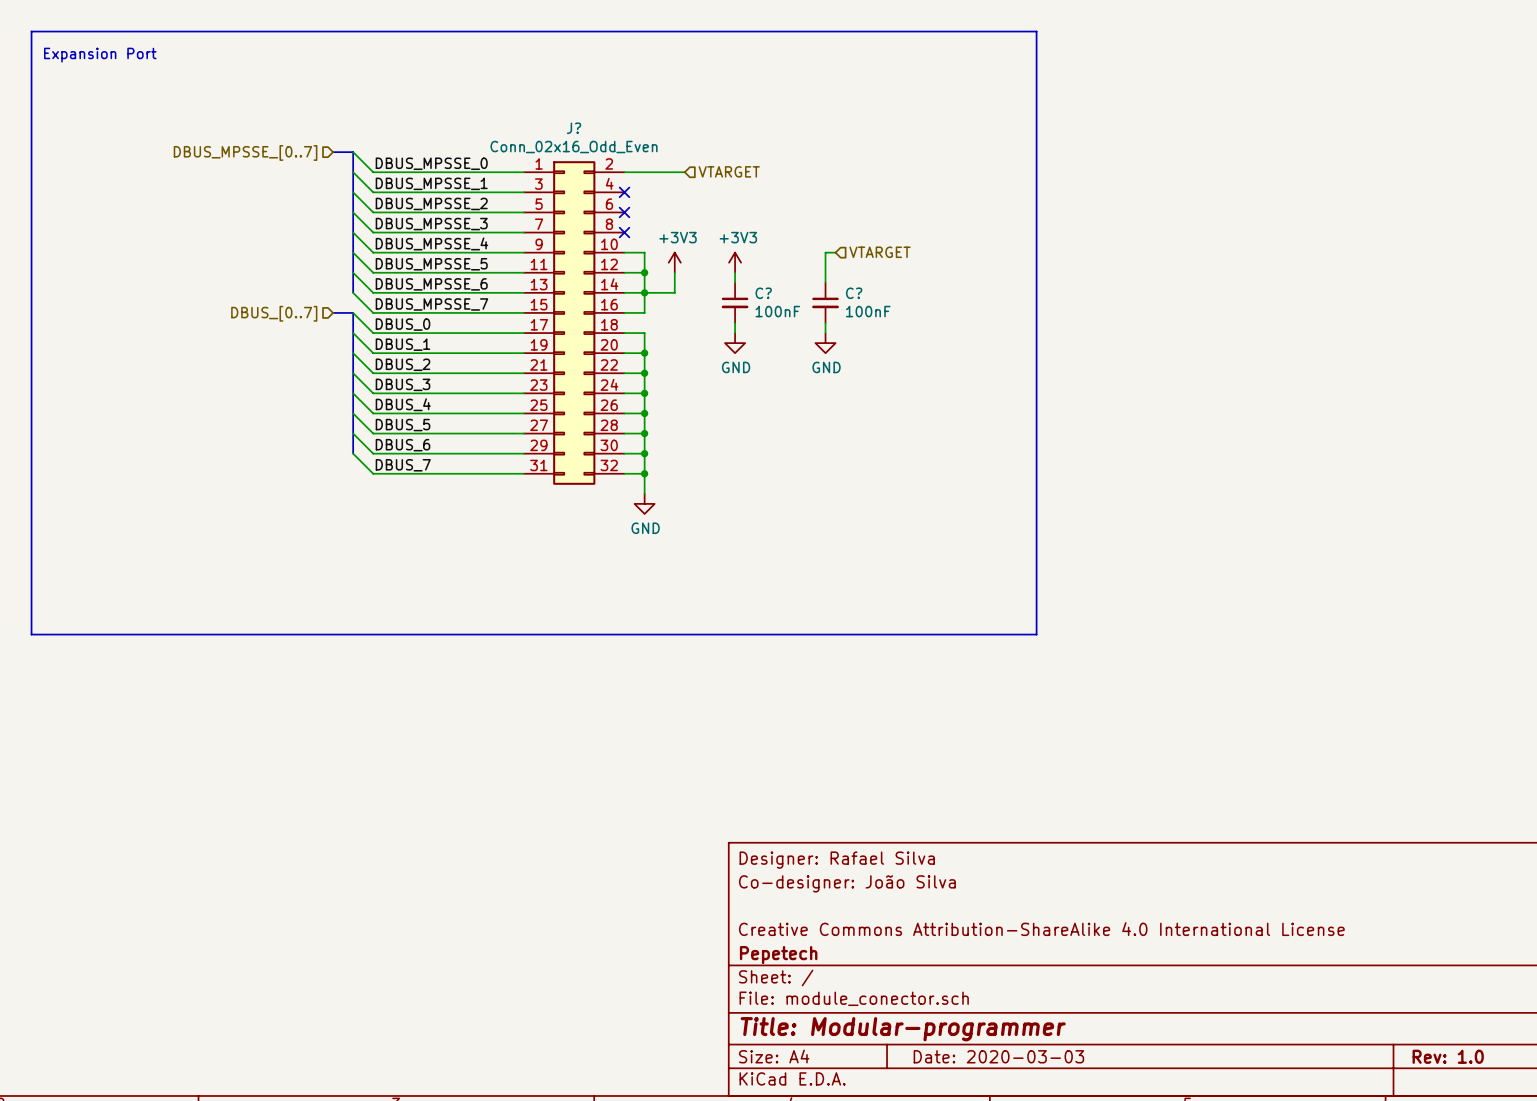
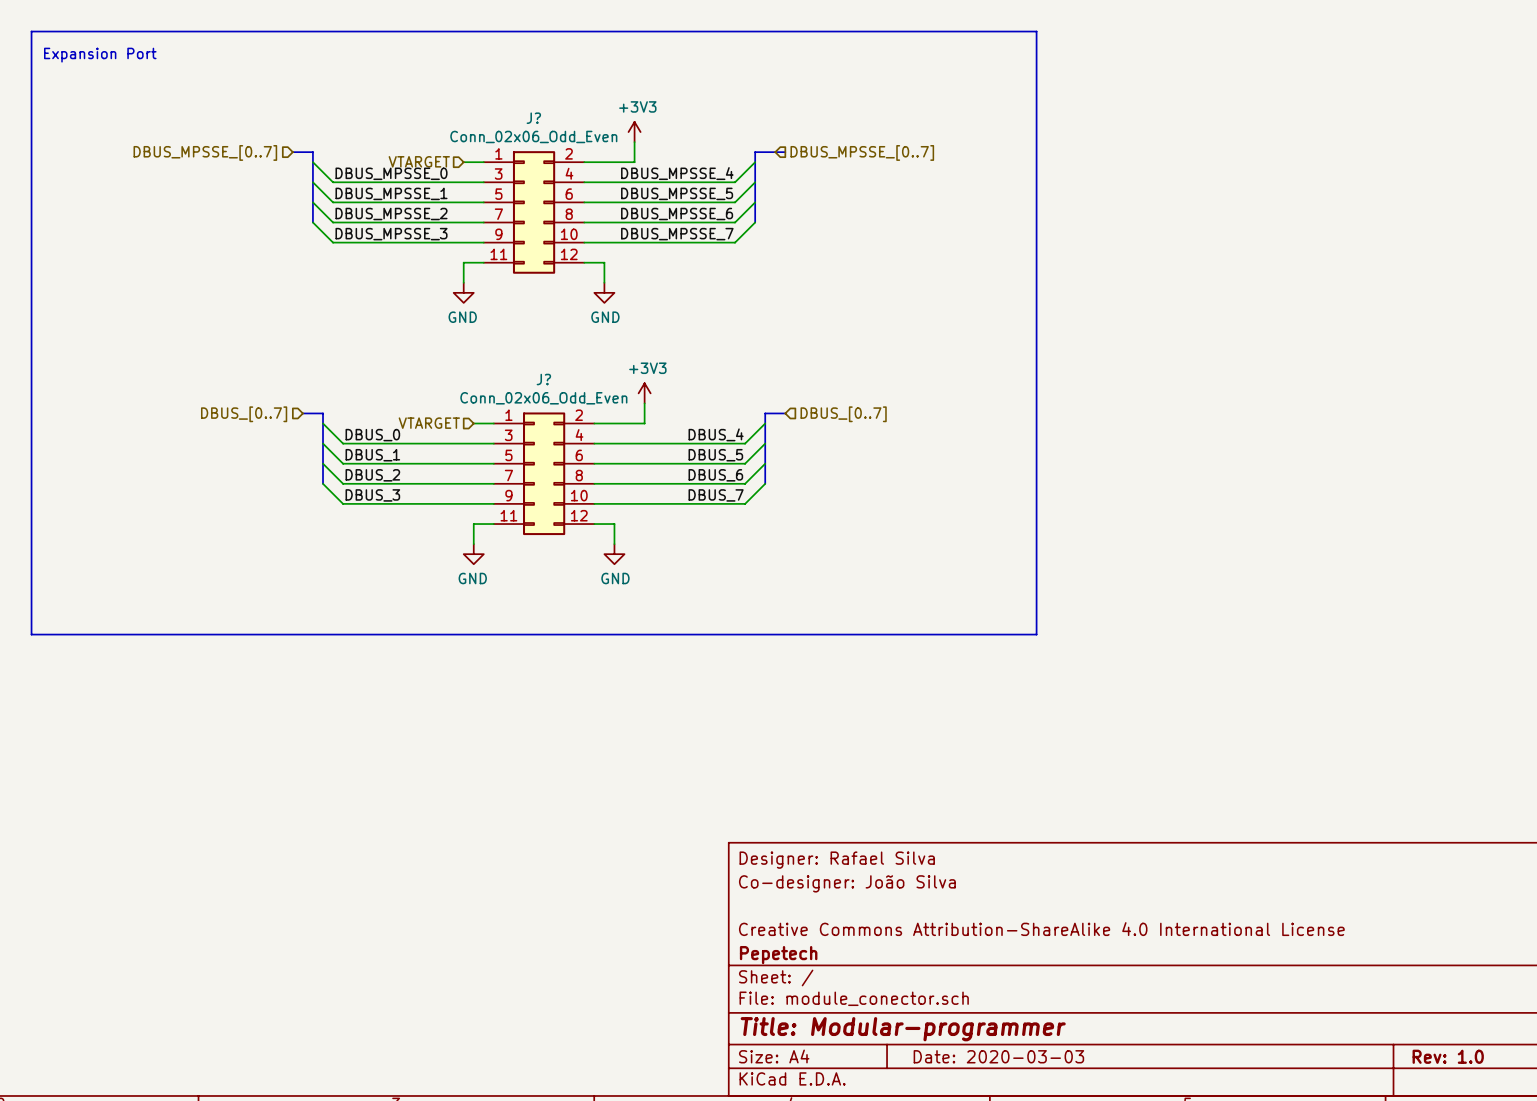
power symbol: none -> +3V3 (634, 132)
hierarchical label position: DBUS_MPSSE_[0..7] (245, 152) -> DBUS_MPSSE_[0..7] (205, 152)
bus: none -> (292, 152) (312, 152) (312, 222)
bus: (333, 152) (353, 152) (353, 292) -> none
wire: (353, 152) (373, 172) (524, 172) -> none
bus: none -> (785, 152) (755, 152) (755, 222)
hierarchical label: none -> DBUS_MPSSE_[0..7] (862, 152)
hierarchical label: none -> VTARGET (419, 161)
wire: none -> (755, 162) (735, 182) (584, 182)
label position: DBUS_MPSSE_0 (431, 163) -> DBUS_MPSSE_0 (391, 173)
hierarchical label: VTARGET (729, 171) -> none
wire: (353, 172) (373, 192) (524, 192) -> none
wire: (624, 172) (684, 172) -> none
label: none -> DBUS_MPSSE_4 (677, 173)
wire: none -> (755, 182) (735, 202) (584, 202)
label position: DBUS_MPSSE_1 (431, 183) -> DBUS_MPSSE_1 (391, 193)
wire: (353, 192) (373, 212) (524, 212) -> none
no-connect mark: (624, 192) -> none
label: none -> DBUS_MPSSE_5 (677, 193)
wire: none -> (755, 202) (735, 222) (584, 222)
label position: DBUS_MPSSE_2 (431, 203) -> DBUS_MPSSE_2 (391, 214)
wire: (353, 212) (373, 232) (524, 232) -> none
J?: none -> Conn_02x06_Odd_Even (534, 212)
no-connect mark: (624, 212) -> none
label: none -> DBUS_MPSSE_6 (677, 214)
wire: none -> (755, 222) (735, 242) (584, 242)
label position: DBUS_MPSSE_3 (431, 224) -> DBUS_MPSSE_3 (391, 234)
wire: (353, 232) (373, 252) (524, 252) -> none
no-connect mark: (624, 232) -> none
label: none -> DBUS_MPSSE_7 (677, 234)
label: DBUS_MPSSE_4 (431, 243) -> none
wire: (353, 252) (373, 272) (524, 272) -> none
wire: (624, 252) (644, 252) (644, 312) (624, 312) -> none
wire: (835, 252) (825, 252) (825, 282) -> none
hierarchical label: VTARGET (880, 252) -> none
wire: none -> (483, 262) (463, 262) (463, 282)
power symbol: +3V3 (674, 262) -> none
power symbol: +3V3 (735, 262) -> none
label: DBUS_MPSSE_5 (431, 264) -> none
wire: (353, 272) (373, 292) (524, 292) -> none
wire: (624, 272) (644, 272) -> (463, 162) (483, 162)
junction: (644, 272) -> none
wire: (674, 272) (674, 292) (624, 292) -> (634, 142) (634, 162) (584, 162)
wire: (735, 272) (735, 282) -> none
label: DBUS_MPSSE_6 (431, 284) -> none
wire: (353, 292) (373, 312) (524, 312) -> (312, 162) (333, 182) (483, 182)
power symbol: none -> GND (463, 292)
power symbol: none -> GND (604, 292)
junction: (644, 292) -> none
C?: 100nF (735, 302) -> none
C?: 100nF (825, 302) -> none
label: DBUS_MPSSE_7 (431, 304) -> none
bus: (333, 312) (353, 312) (353, 453) -> none
wire: (353, 312) (373, 333) (524, 333) -> (312, 182) (333, 202) (483, 202)
hierarchical label position: DBUS_[0..7] (274, 313) -> DBUS_[0..7] (244, 414)
J?: Conn_02x16_Odd_Even (574, 323) -> none
wire: (735, 323) (735, 333) -> none
wire: (825, 323) (825, 333) -> none
label position: DBUS_0 (403, 324) -> DBUS_0 (372, 435)
wire: (353, 333) (373, 353) (524, 353) -> (312, 202) (333, 222) (483, 222)
wire: (624, 333) (644, 333) (644, 403) -> none
power symbol: GND (735, 343) -> none
power symbol: GND (825, 343) -> none
label position: DBUS_1 (403, 344) -> DBUS_1 (372, 455)
wire: (353, 353) (373, 373) (524, 373) -> (312, 222) (333, 242) (483, 242)
wire: (624, 353) (644, 353) -> none
junction: (644, 353) -> none
label position: DBUS_2 (403, 364) -> DBUS_2 (372, 475)
wire: (353, 373) (373, 393) (524, 393) -> none
wire: (624, 373) (644, 373) -> none
junction: (644, 373) -> none
label position: DBUS_3 (403, 384) -> DBUS_3 (372, 495)
wire: (353, 393) (373, 413) (524, 413) -> (323, 423) (343, 443) (493, 443)
wire: (624, 393) (644, 393) -> none
junction: (644, 393) -> none
power symbol: none -> +3V3 (644, 393)
label: DBUS_4 (403, 404) -> none
bus: none -> (302, 413) (323, 413) (323, 483)
wire: (353, 413) (373, 433) (524, 433) -> (323, 443) (343, 463) (493, 463)
wire: (624, 413) (644, 413) -> (473, 423) (493, 423)
junction: (644, 413) -> none
bus: none -> (785, 413) (765, 413) (765, 483)
hierarchical label: none -> DBUS_[0..7] (843, 414)
hierarchical label: none -> VTARGET (429, 423)
wire: (644, 423) (644, 493) -> (644, 423) (594, 423)
wire: none -> (765, 423) (745, 443) (594, 443)
label: DBUS_5 (403, 425) -> none
wire: (353, 433) (373, 453) (524, 453) -> (323, 463) (343, 483) (493, 483)
wire: (624, 433) (644, 433) -> none
junction: (644, 433) -> none
label: none -> DBUS_4 (716, 434)
wire: none -> (765, 443) (745, 463) (594, 463)
label: DBUS_6 (403, 445) -> none
wire: (353, 453) (373, 473) (524, 473) -> (323, 483) (343, 503) (493, 503)
wire: (624, 453) (644, 453) -> none
junction: (644, 453) -> none
label: none -> DBUS_5 (715, 455)
wire: none -> (765, 463) (745, 483) (594, 483)
label: DBUS_7 (403, 465) -> none
J?: none -> Conn_02x06_Odd_Even (544, 473)
wire: (624, 473) (644, 473) -> none
junction: (644, 473) -> none
label: none -> DBUS_6 (715, 475)
wire: none -> (765, 483) (745, 503) (594, 503)
label: none -> DBUS_7 (716, 495)
power symbol position: GND (644, 503) -> GND (614, 554)
wire: none -> (493, 524) (473, 524) (473, 544)
wire: none -> (594, 524) (614, 524) (614, 544)
power symbol: none -> GND (473, 554)

